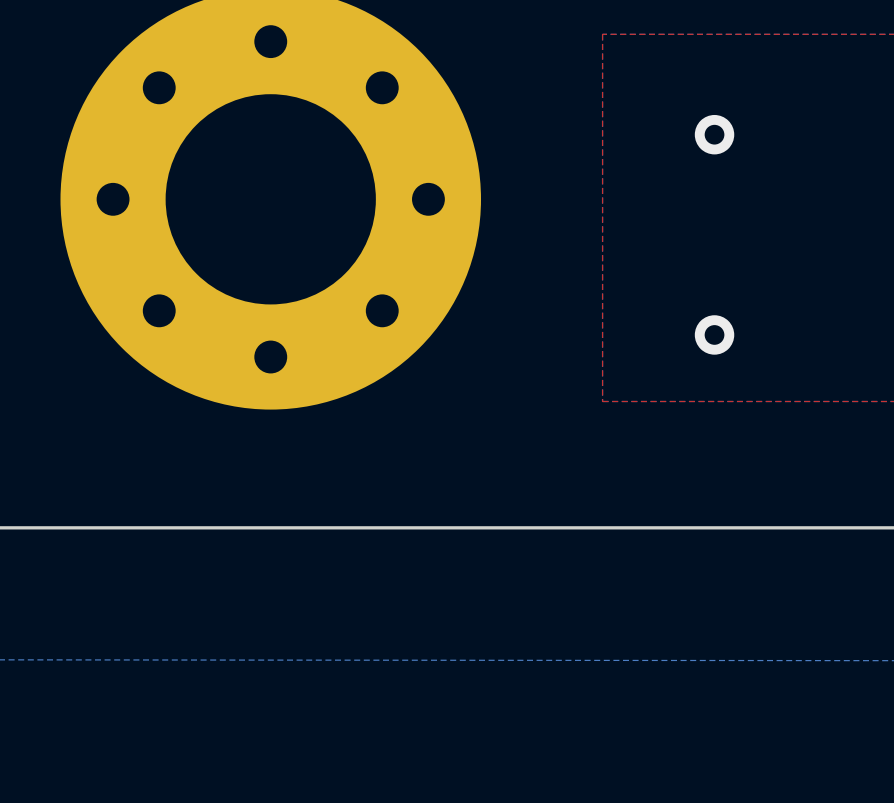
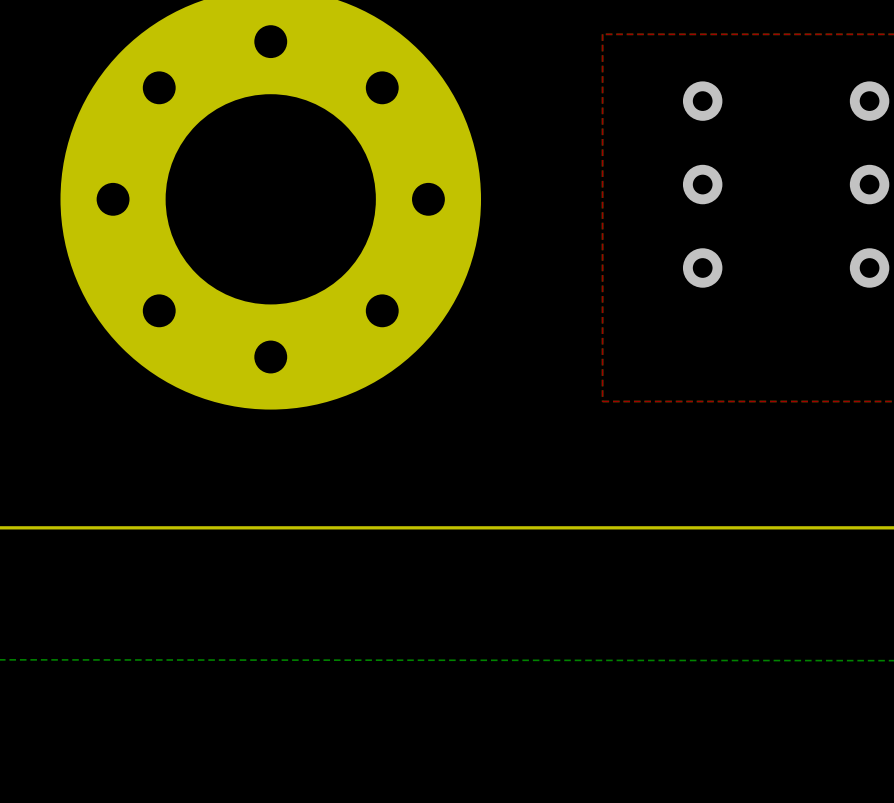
via: none -> (869, 101)
via position: (714, 134) -> (702, 101)
via: none -> (702, 184)
via: none -> (869, 184)
via: none -> (702, 267)
via: none -> (869, 267)
via: (714, 334) -> none

